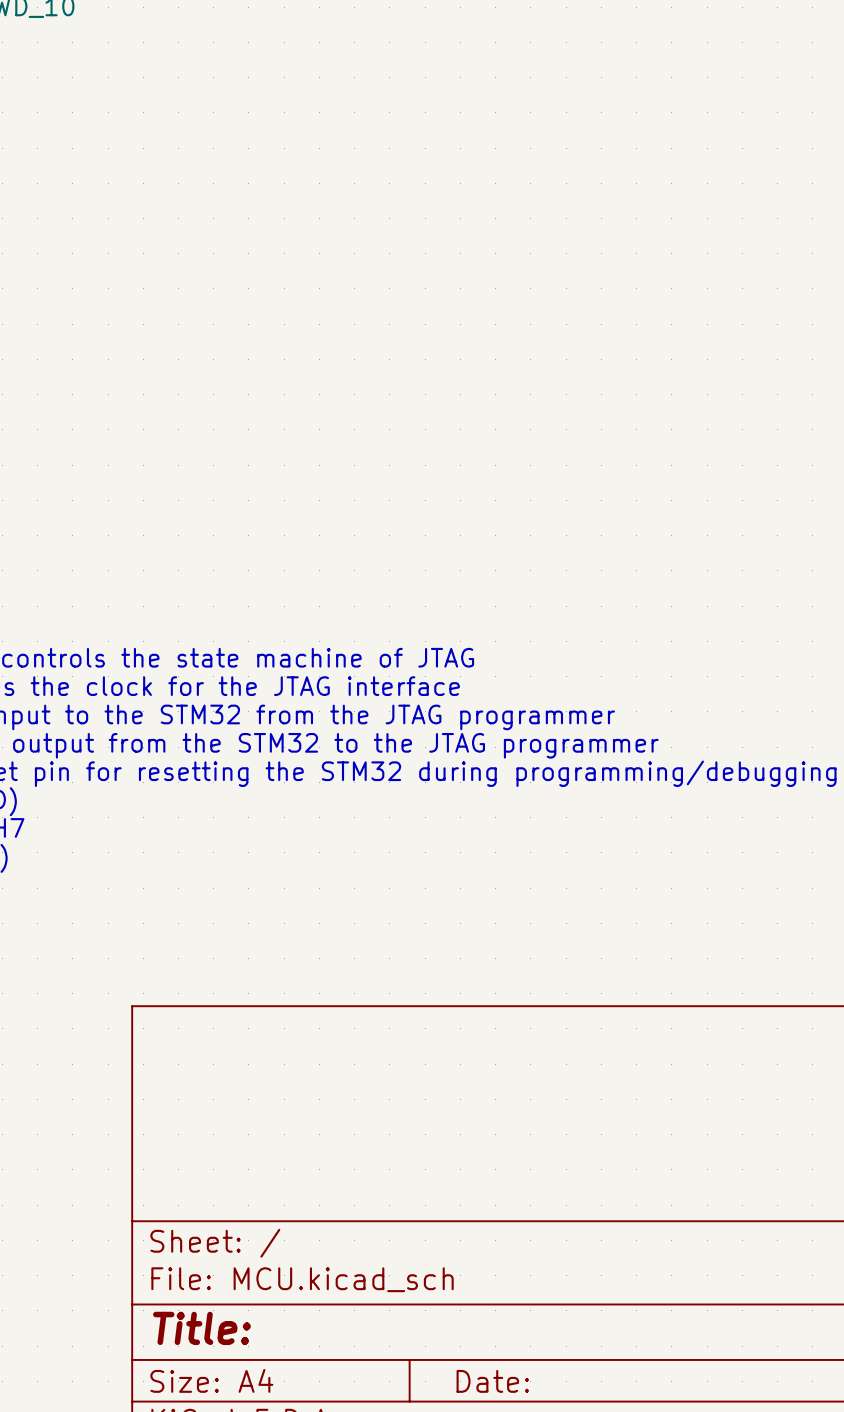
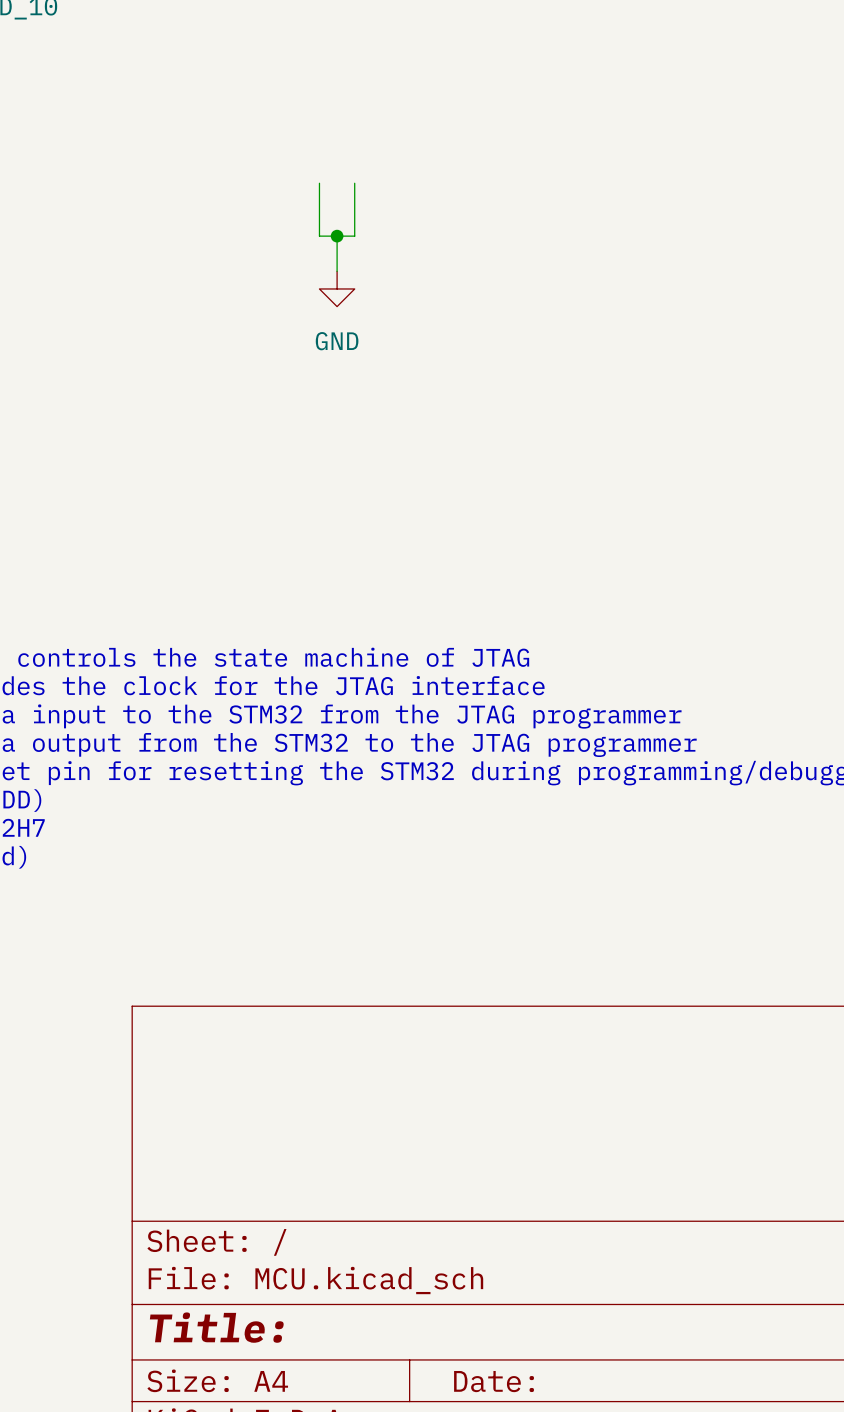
wire: none -> (319, 183) (319, 236) (354, 236) (354, 183)
wire: none -> (337, 236) (337, 271)
junction: none -> (337, 236)
power symbol: none -> GND (337, 288)

